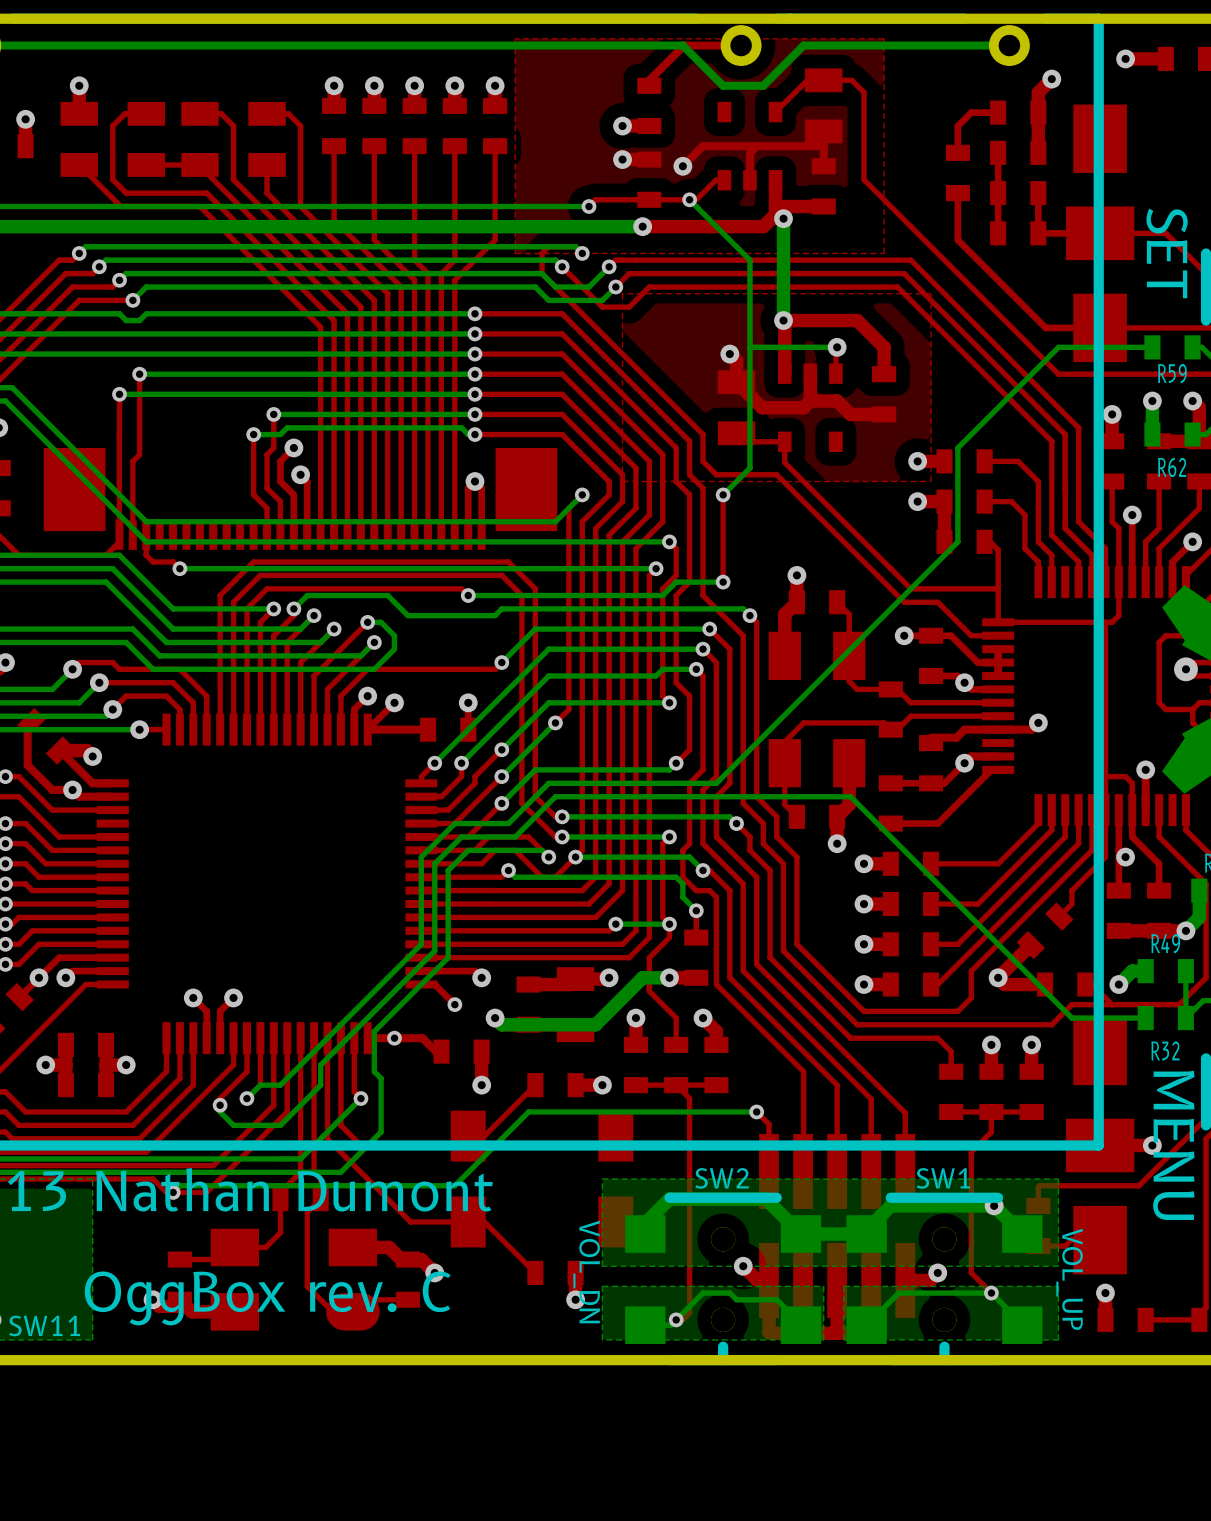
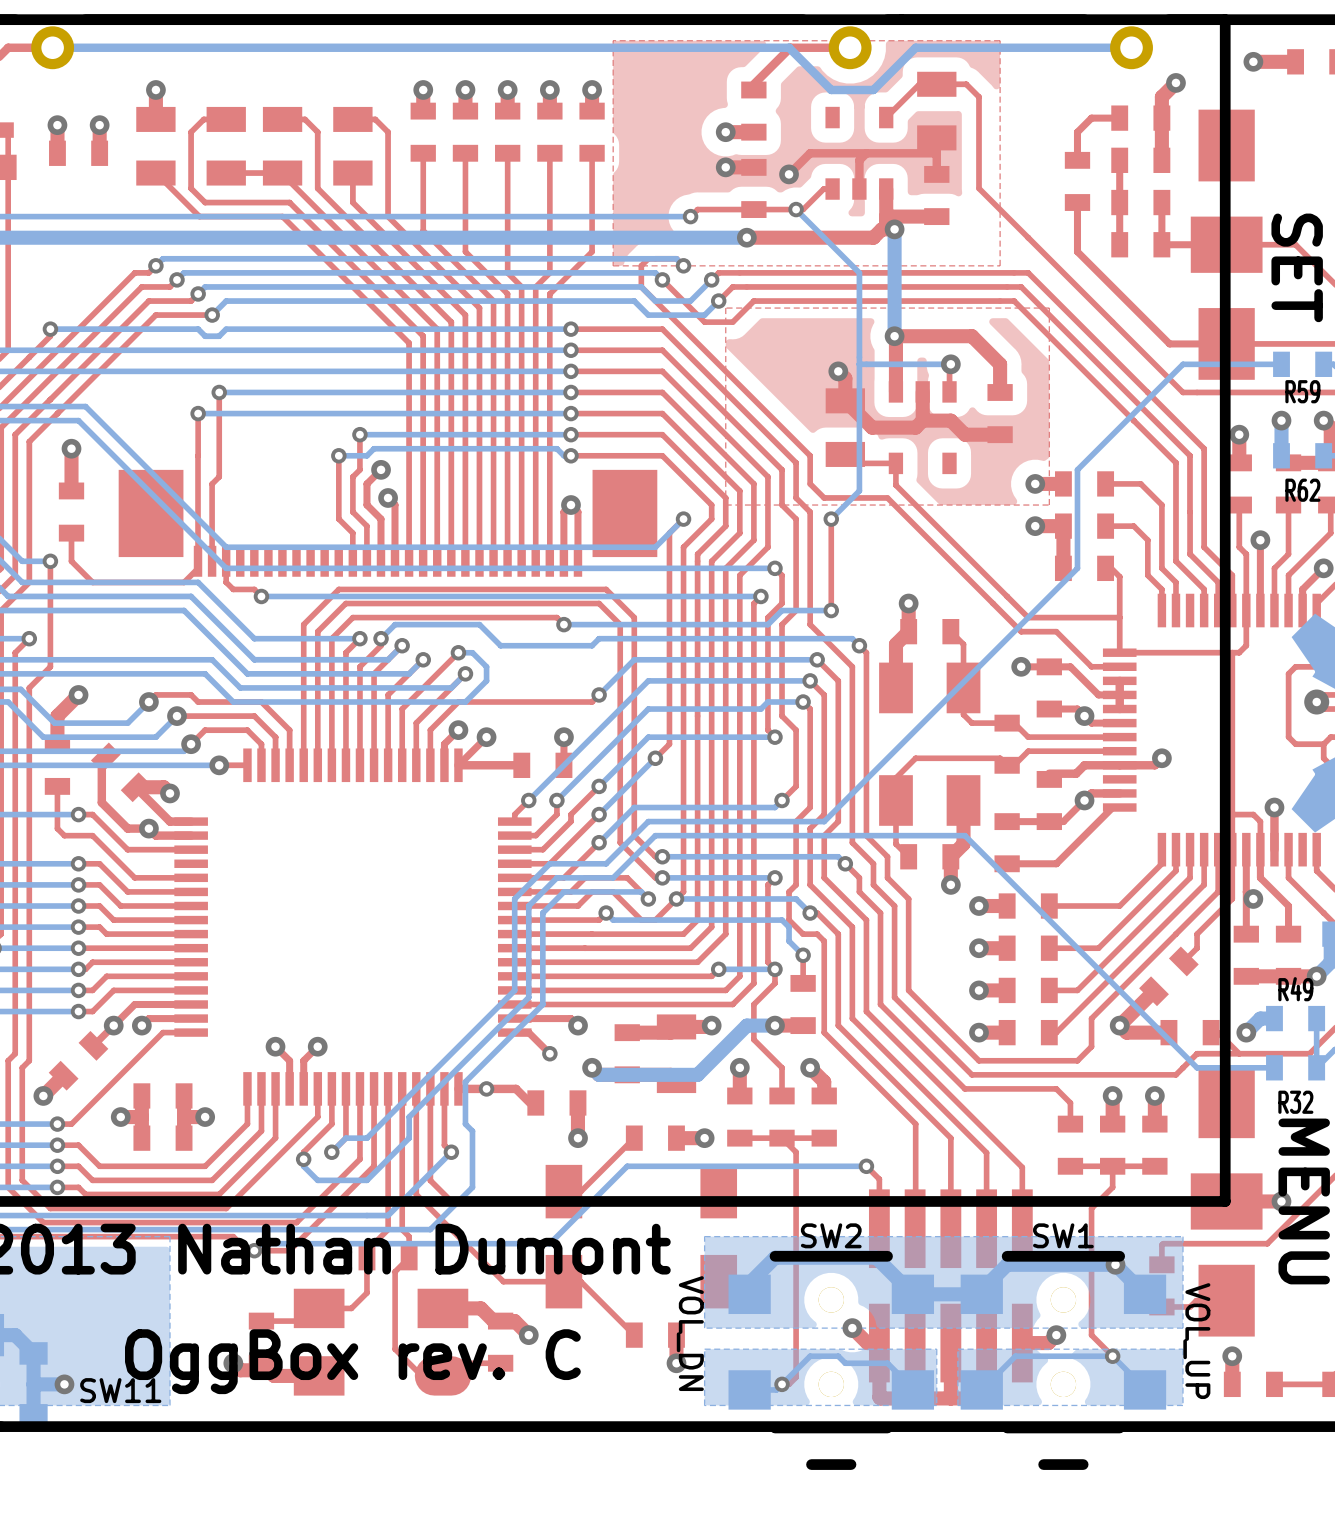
SW2 footprint: [625, 1192, 822, 1366] -> [728, 1250, 935, 1470]
SW1 footprint: [846, 1192, 1043, 1366] -> [960, 1250, 1167, 1470]

